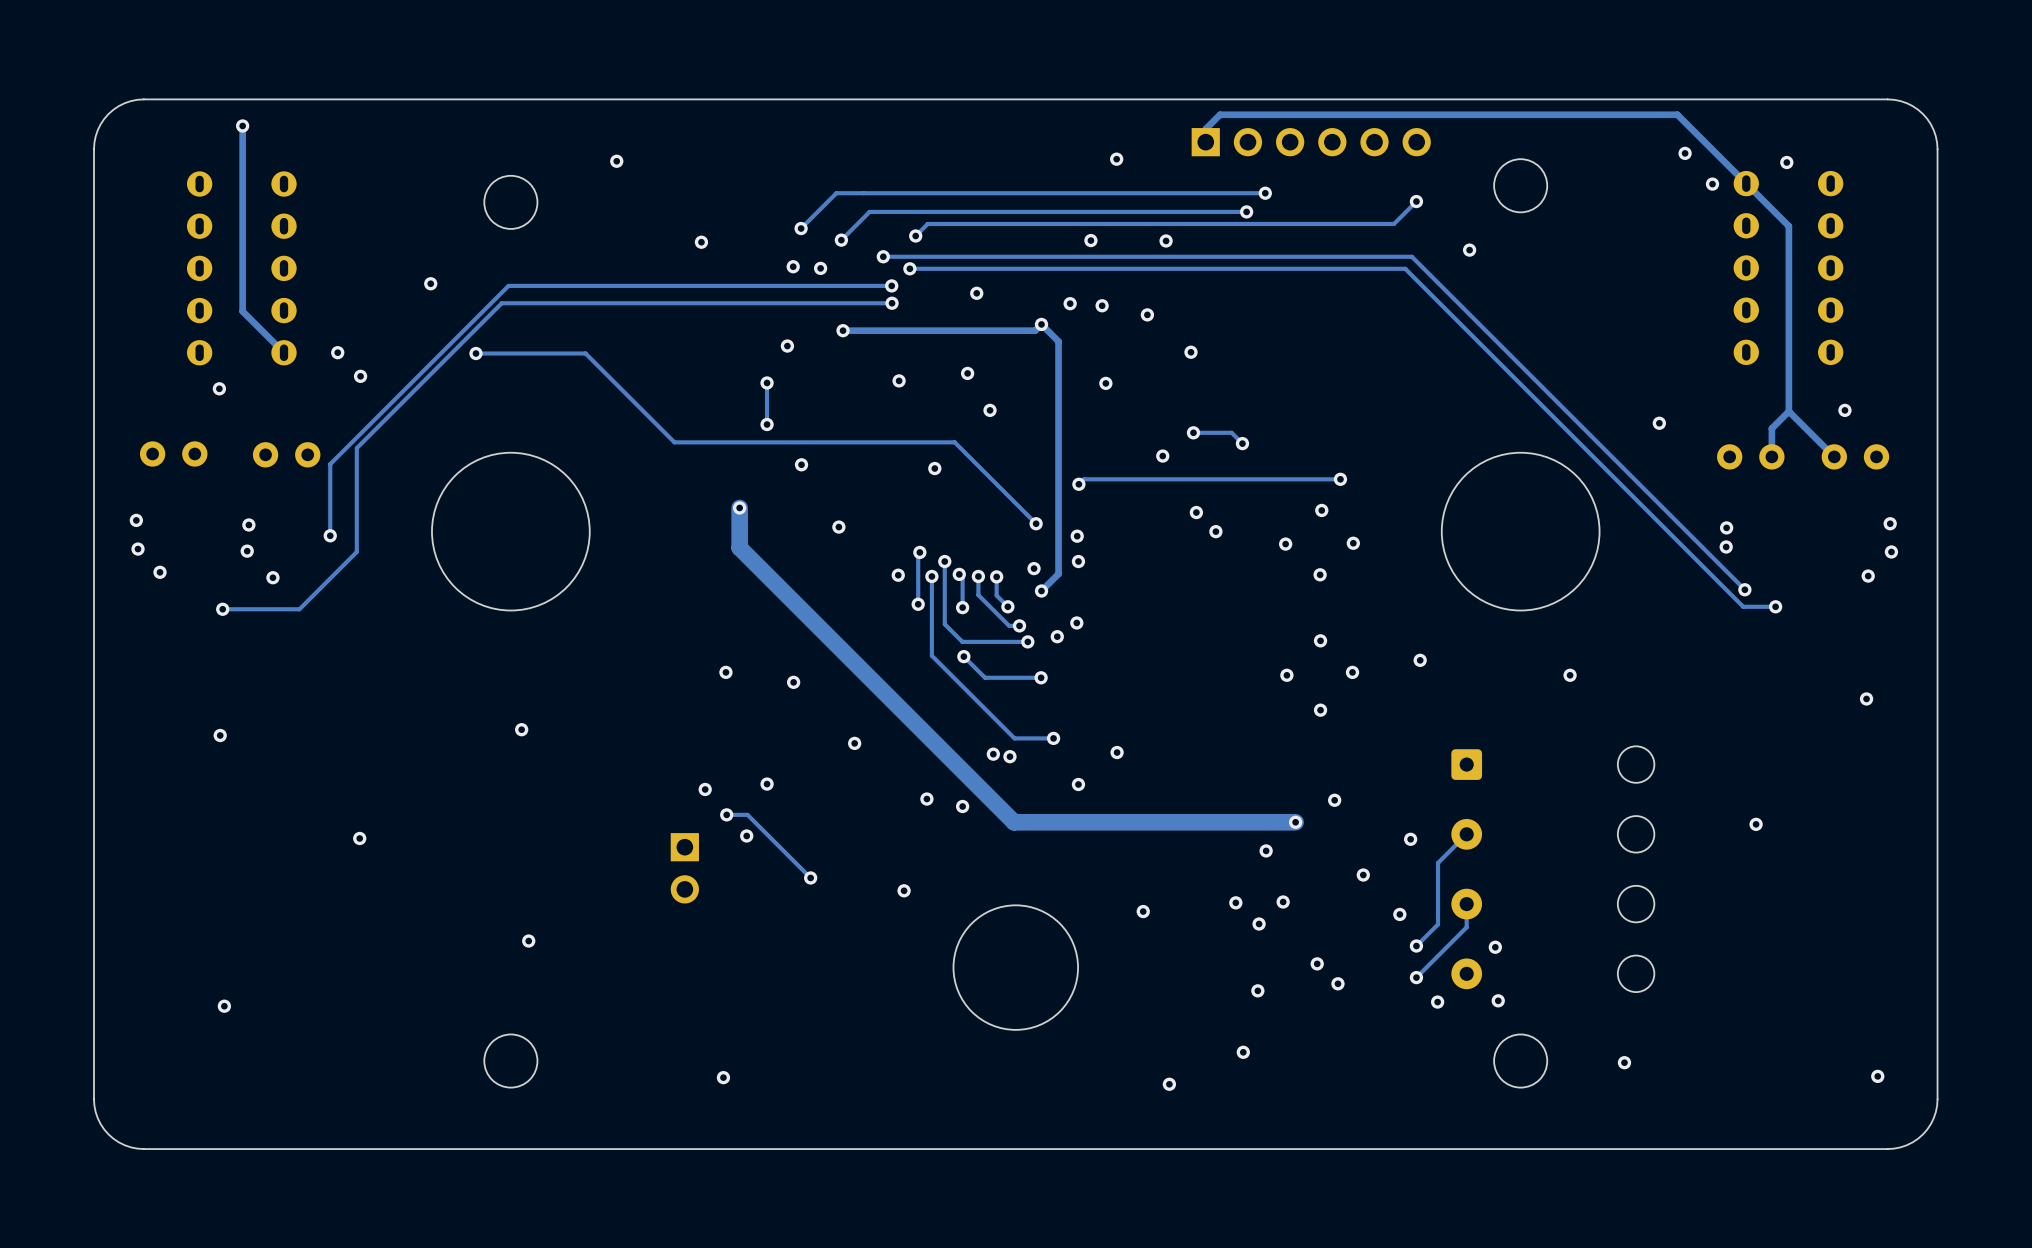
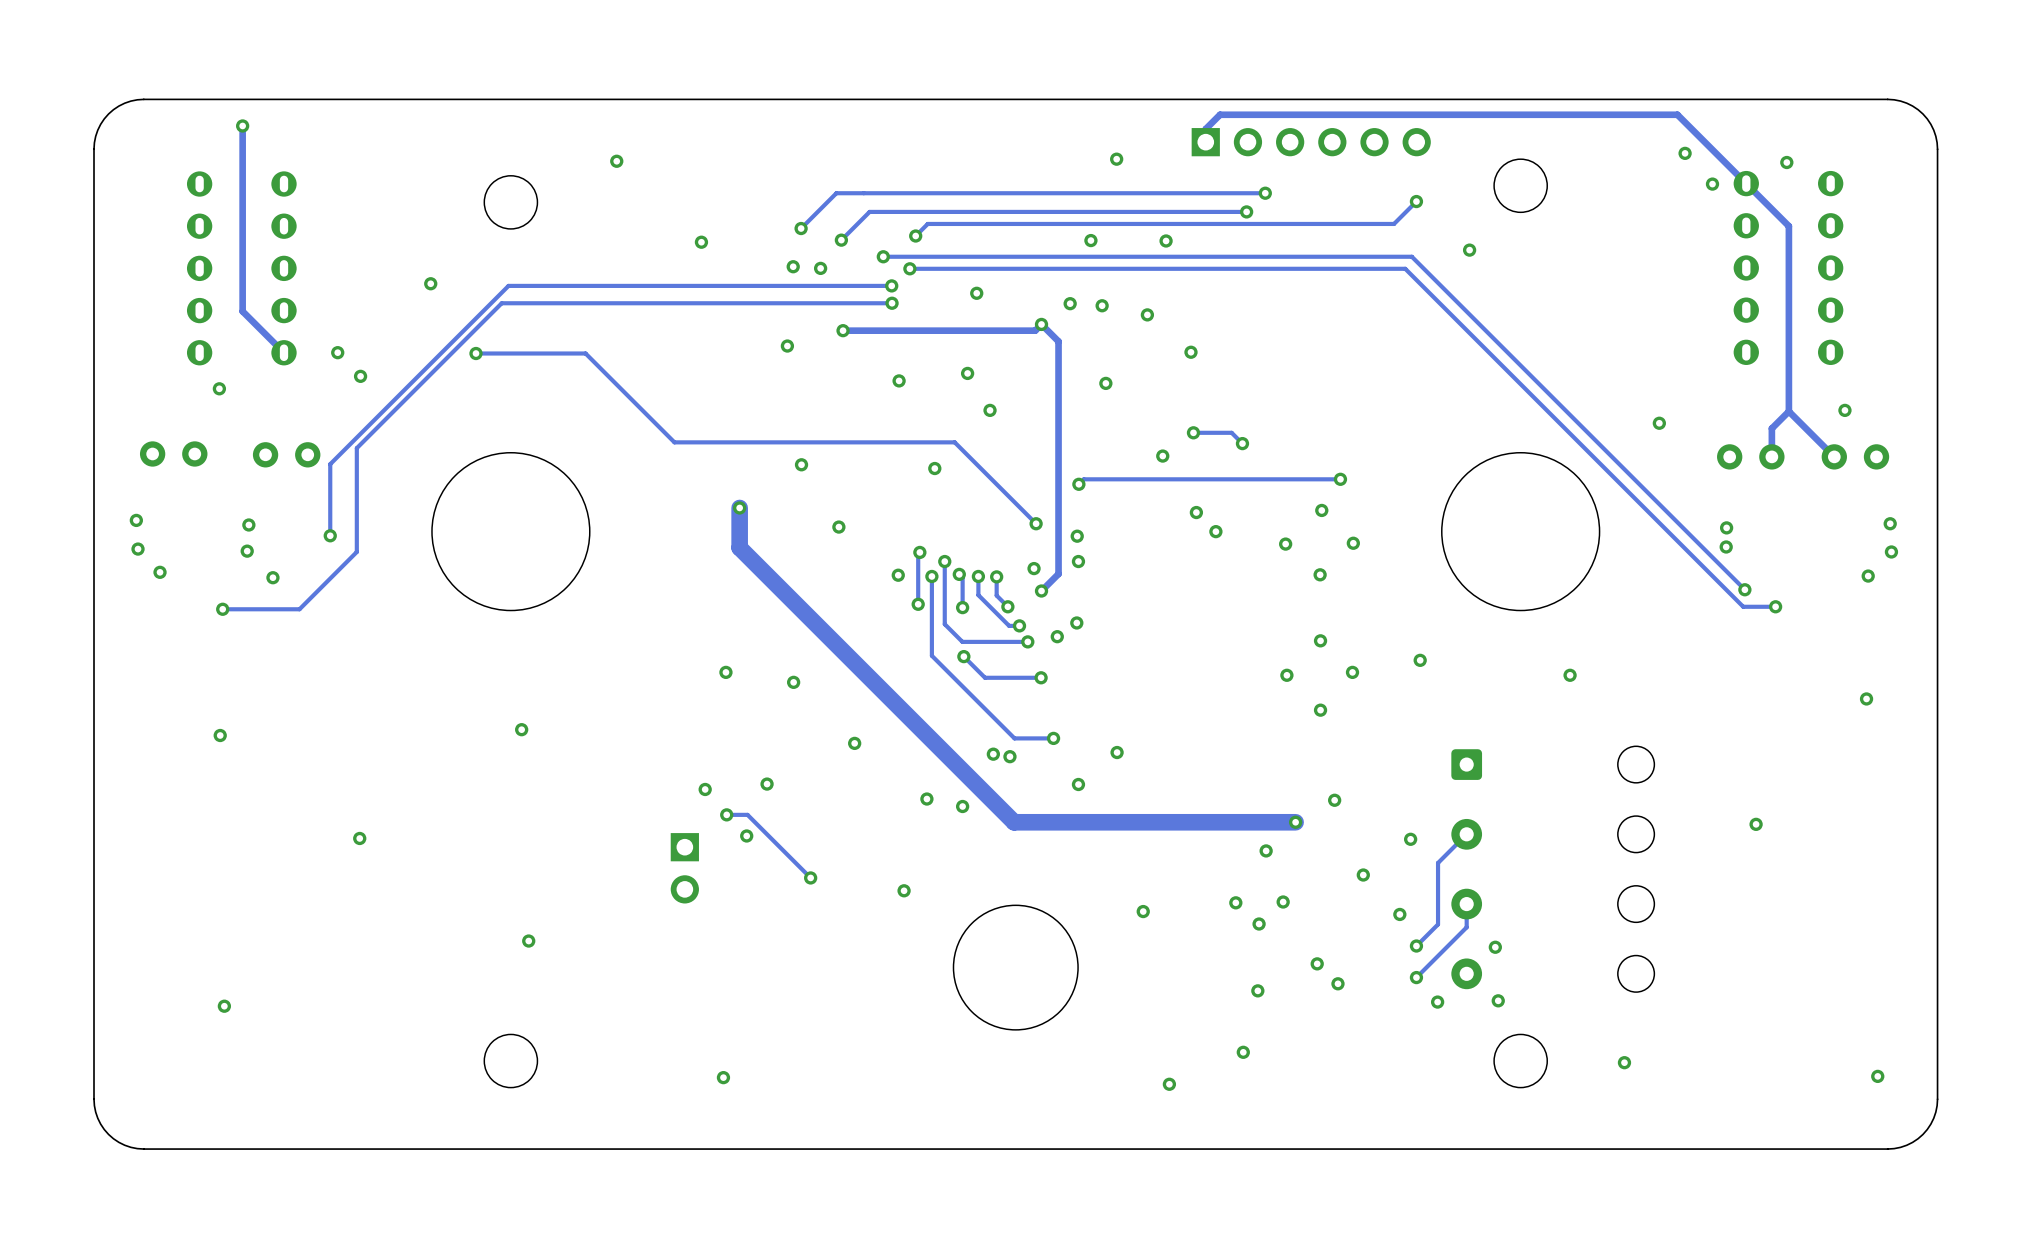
track: (767, 382) (767, 424) -> none
via: (767, 382) -> none
via: (767, 424) -> none

